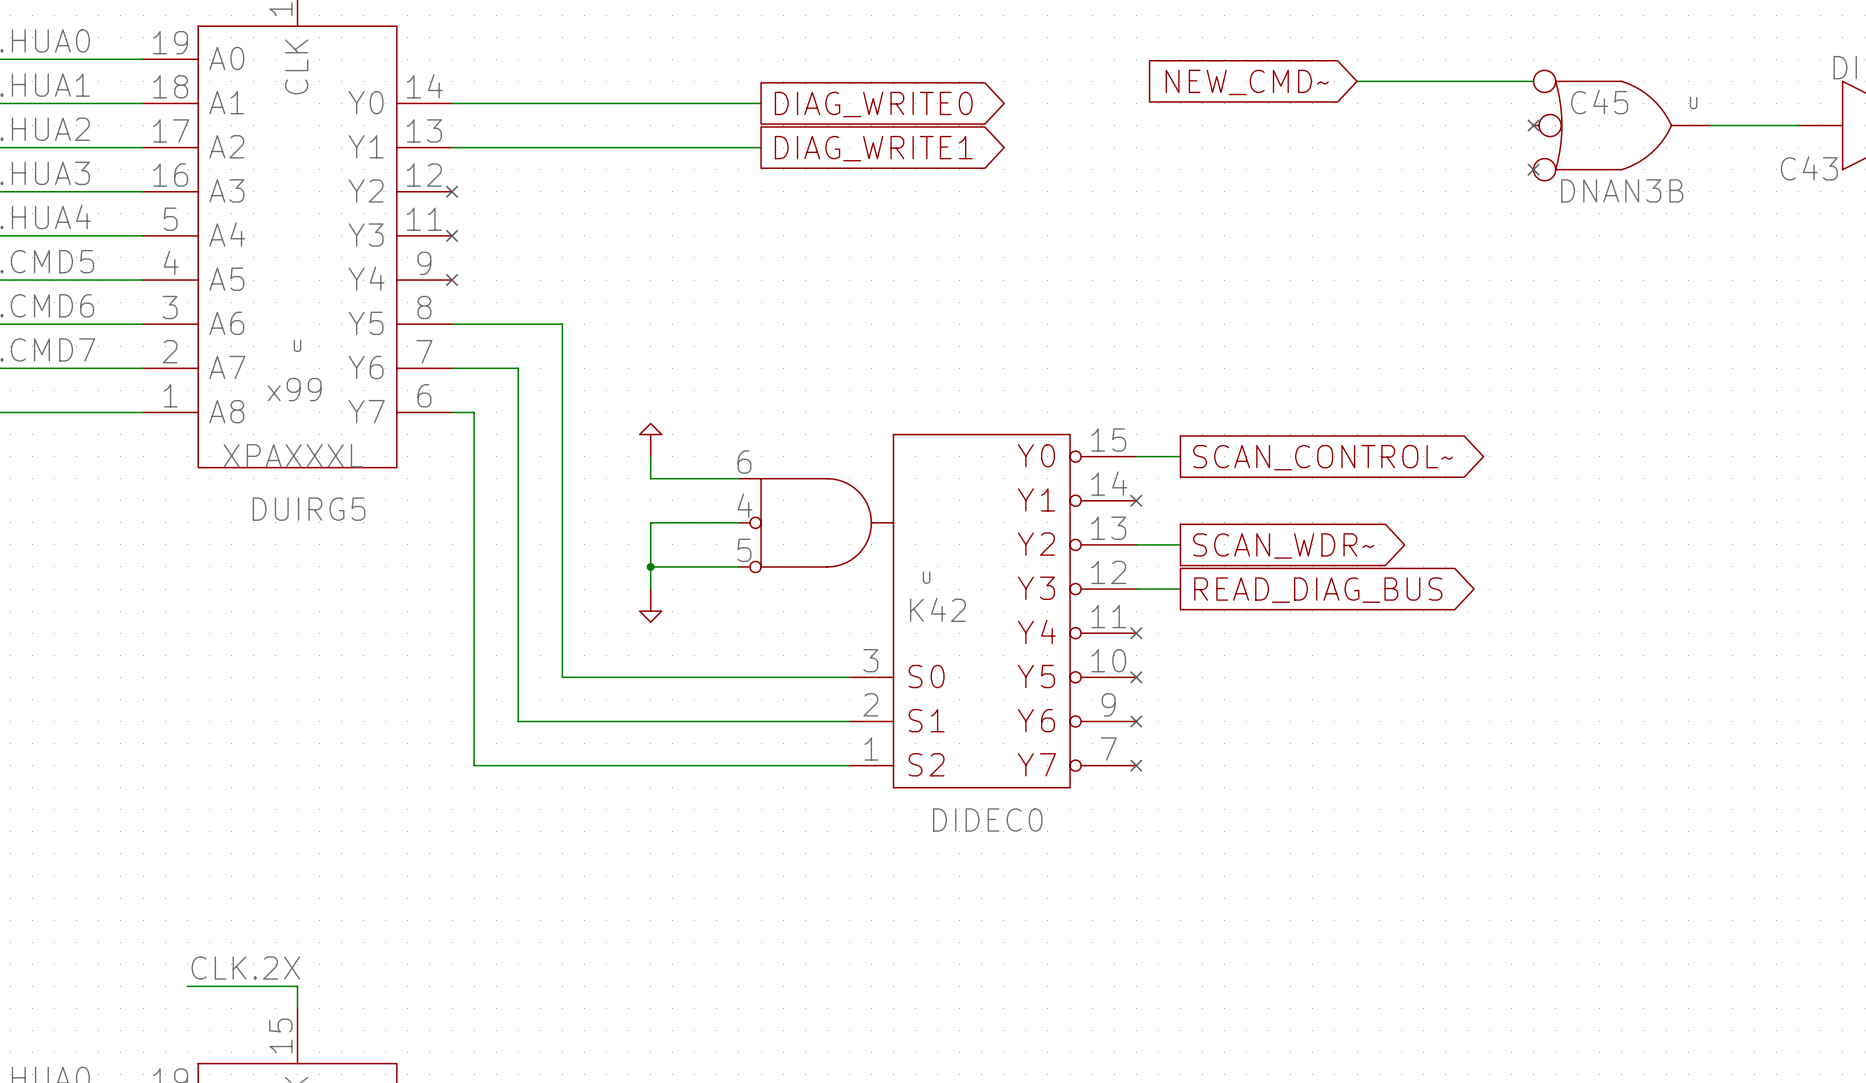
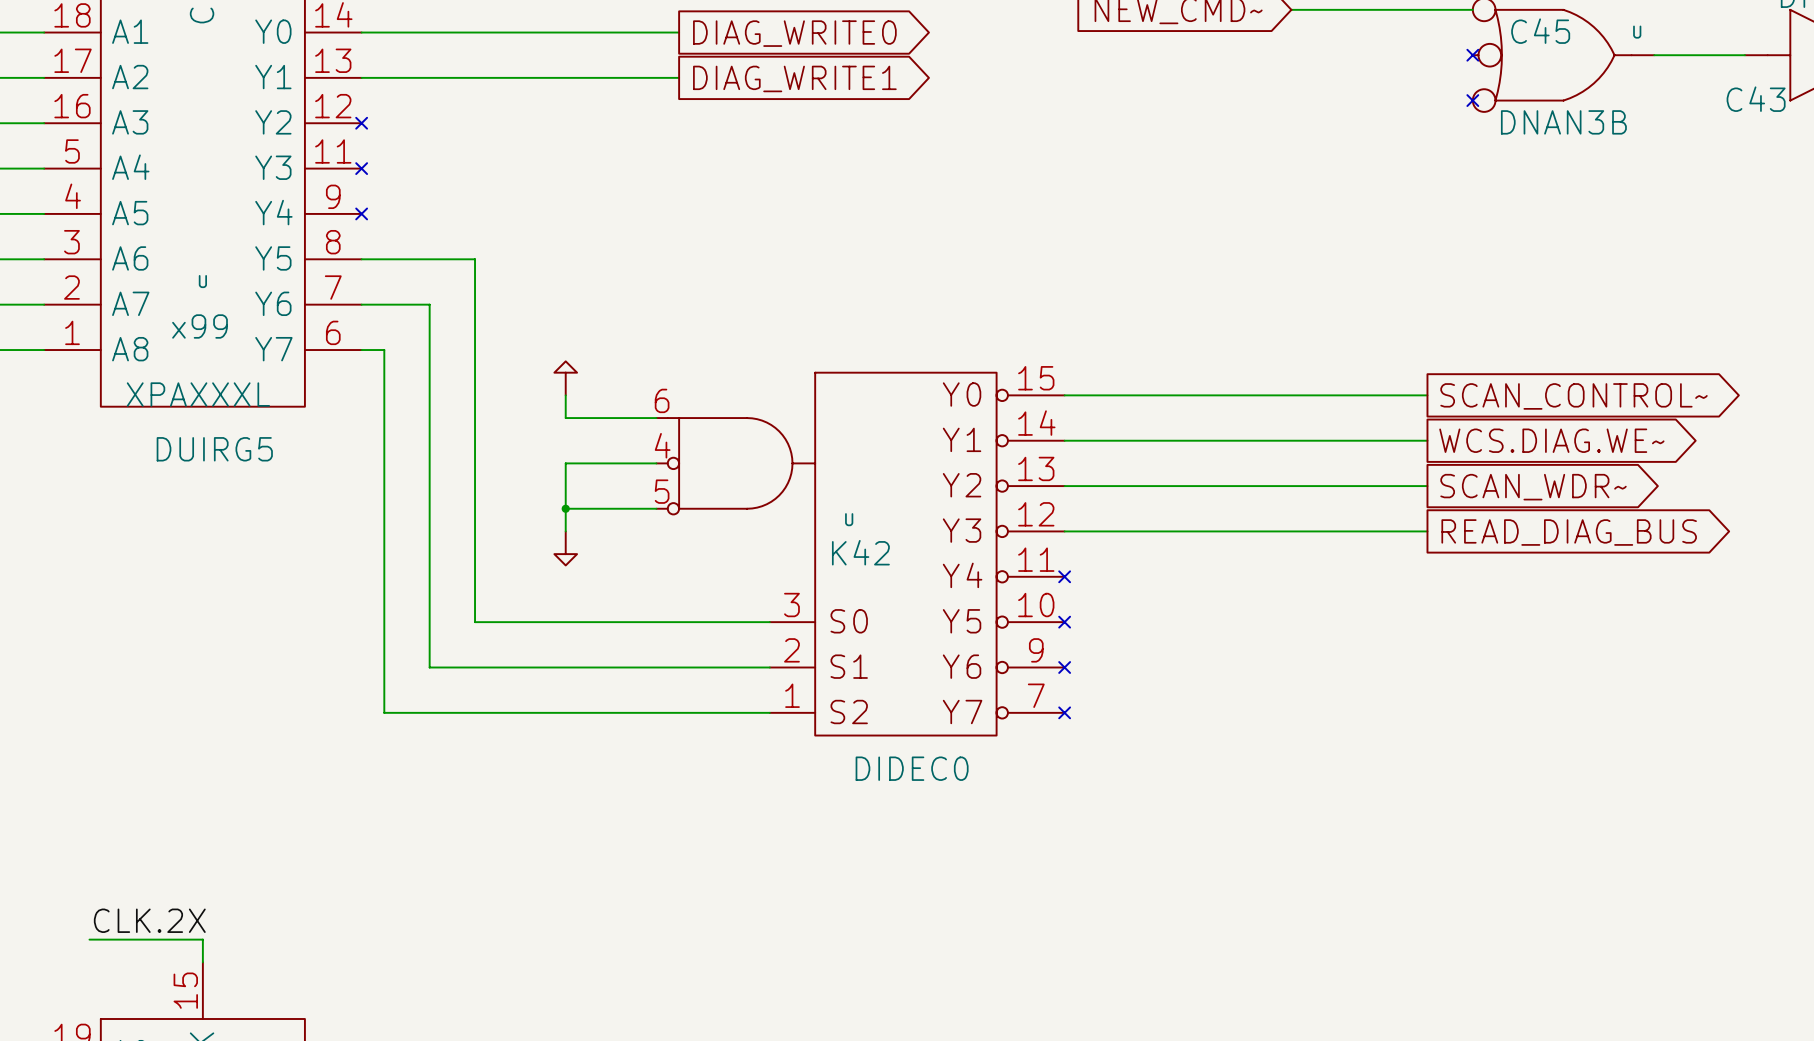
wire: none -> (1109, 395) (1427, 395)
global label: SCAN_CONTROL~ (1323, 457) -> none
global label: none -> SCAN_CONTROL~ (1574, 396)
wire: none -> (1064, 440) (1427, 440)
no-connect mark: (1136, 500) -> none
global label: none -> WCS.DIAG.WE~ (1551, 440)
wire: none -> (1109, 486) (1427, 486)
global label: SCAN_WDR~ (1283, 545) -> none
global label: none -> SCAN_WDR~ (1533, 487)
wire: none -> (1109, 531) (1427, 531)
global label: READ_DIAG_BUS (1318, 590) -> none
global label: none -> READ_DIAG_BUS (1569, 532)

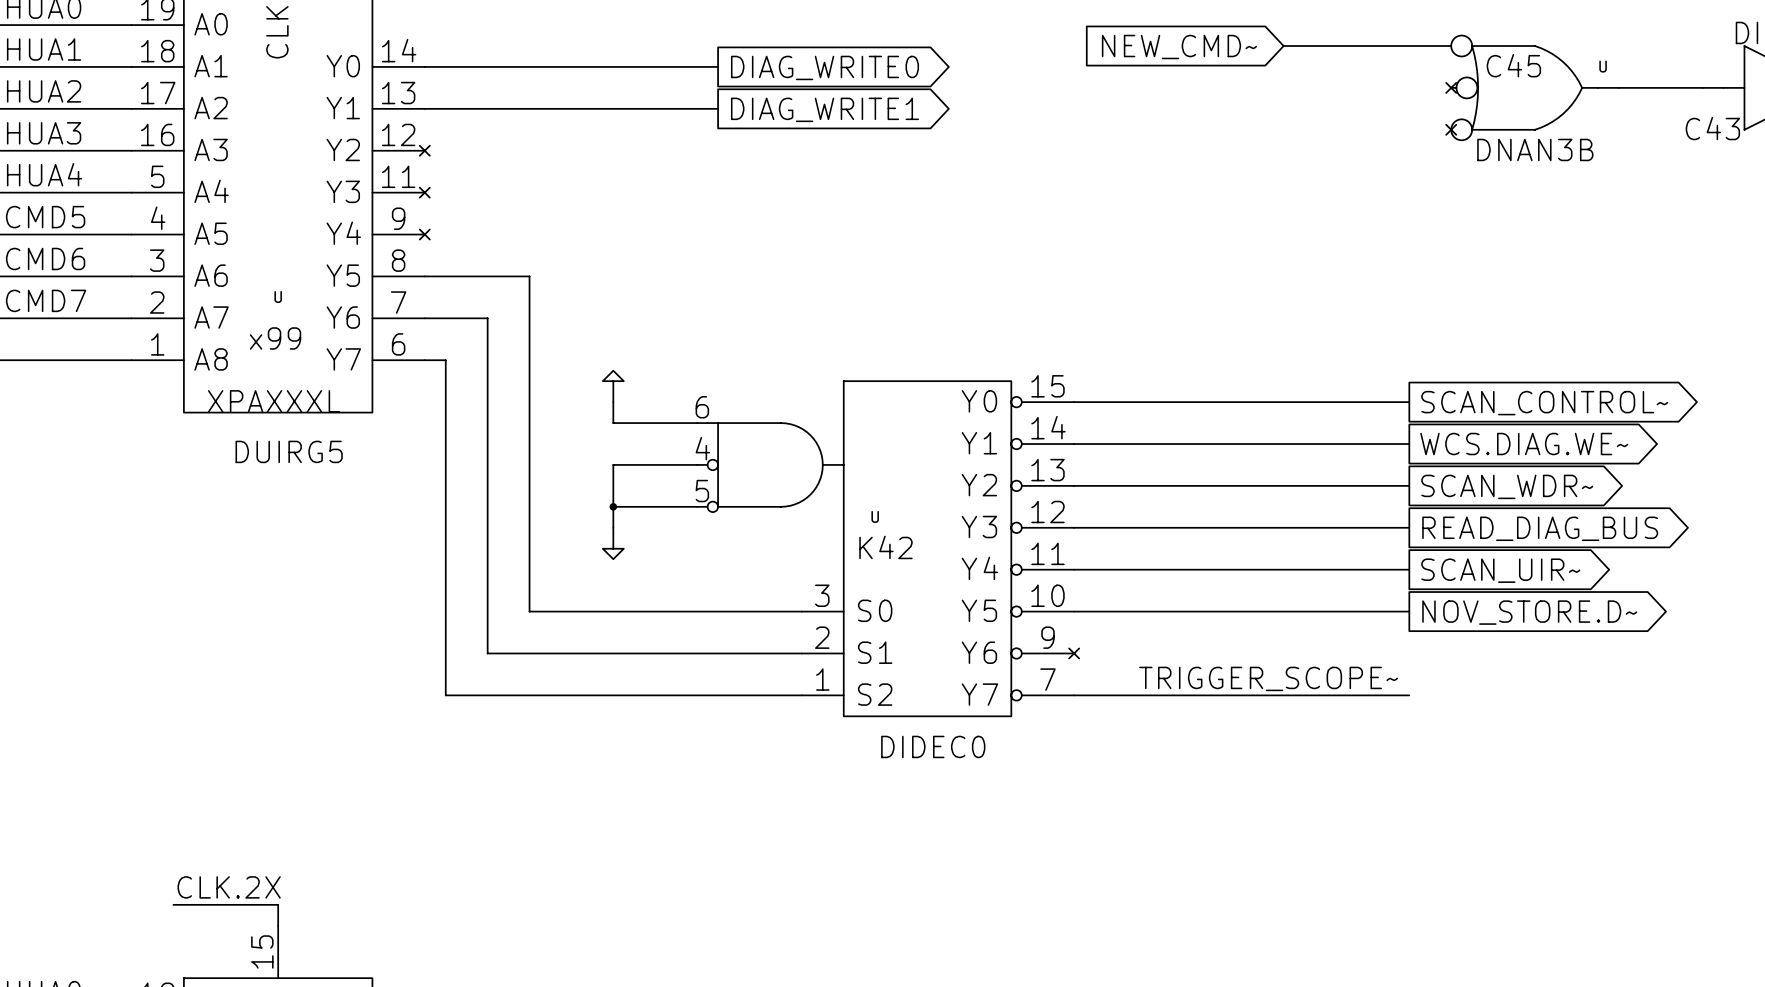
wire: none -> (1074, 569) (1409, 569)
no-connect mark: (1064, 576) -> none
global label: none -> SCAN_UIR~ (1500, 570)
wire: none -> (1074, 611) (1409, 611)
no-connect mark: (1064, 622) -> none
global label: none -> NOV_STORE.D~ (1529, 612)
label: none -> TRIGGER_SCOPE~ (1268, 678)
wire: none -> (1074, 695) (1409, 695)
no-connect mark: (1064, 712) -> none

